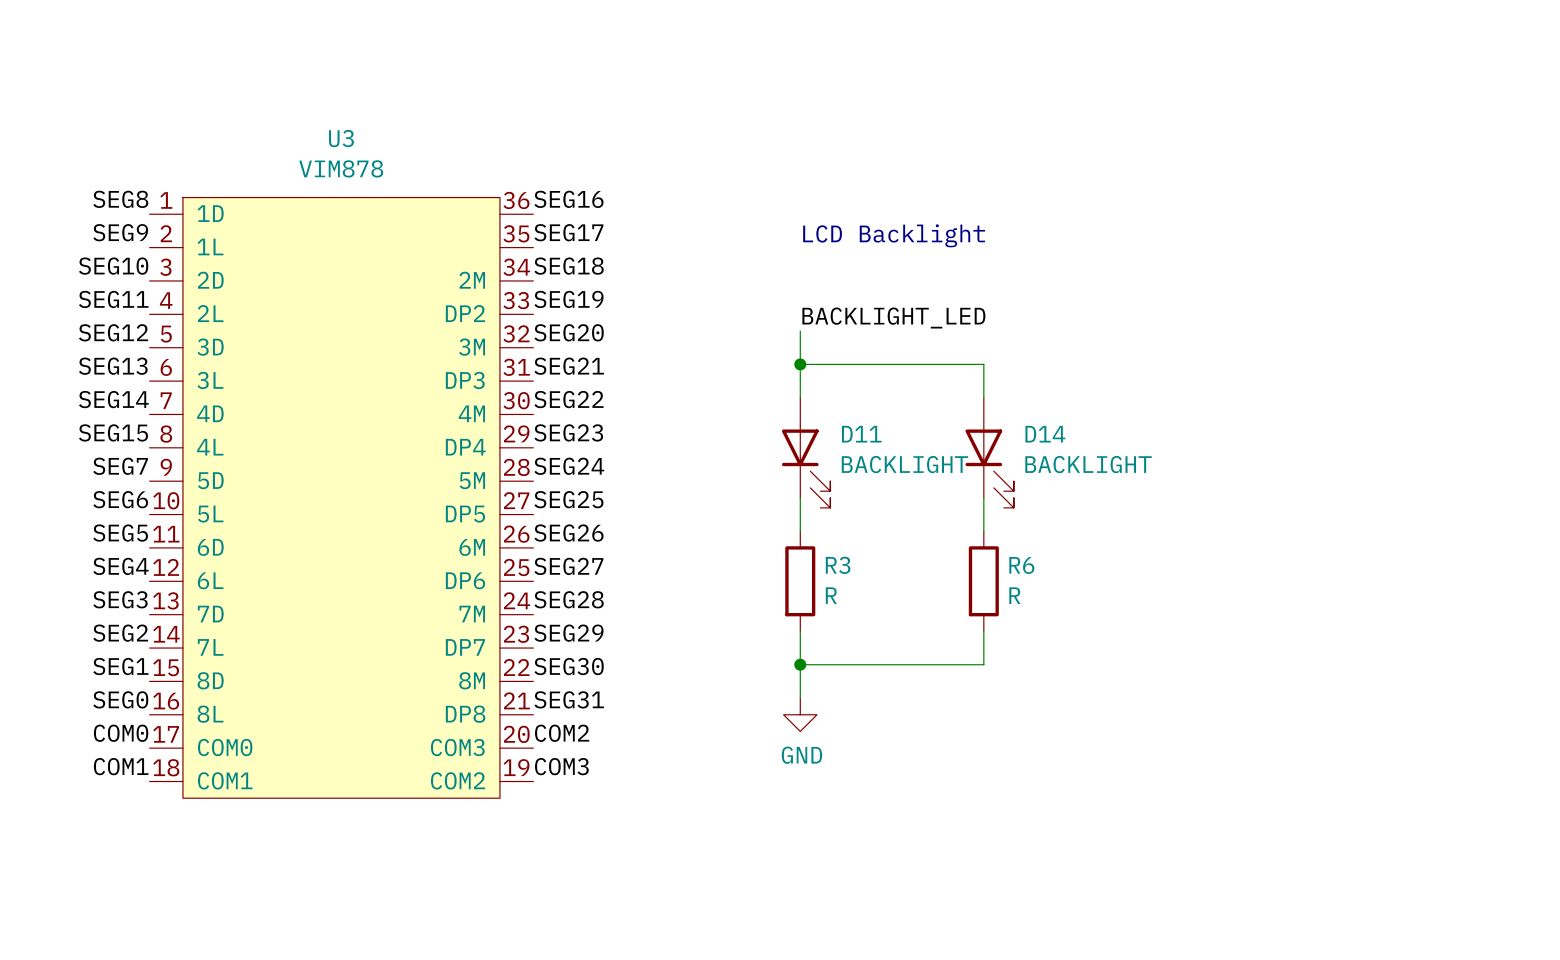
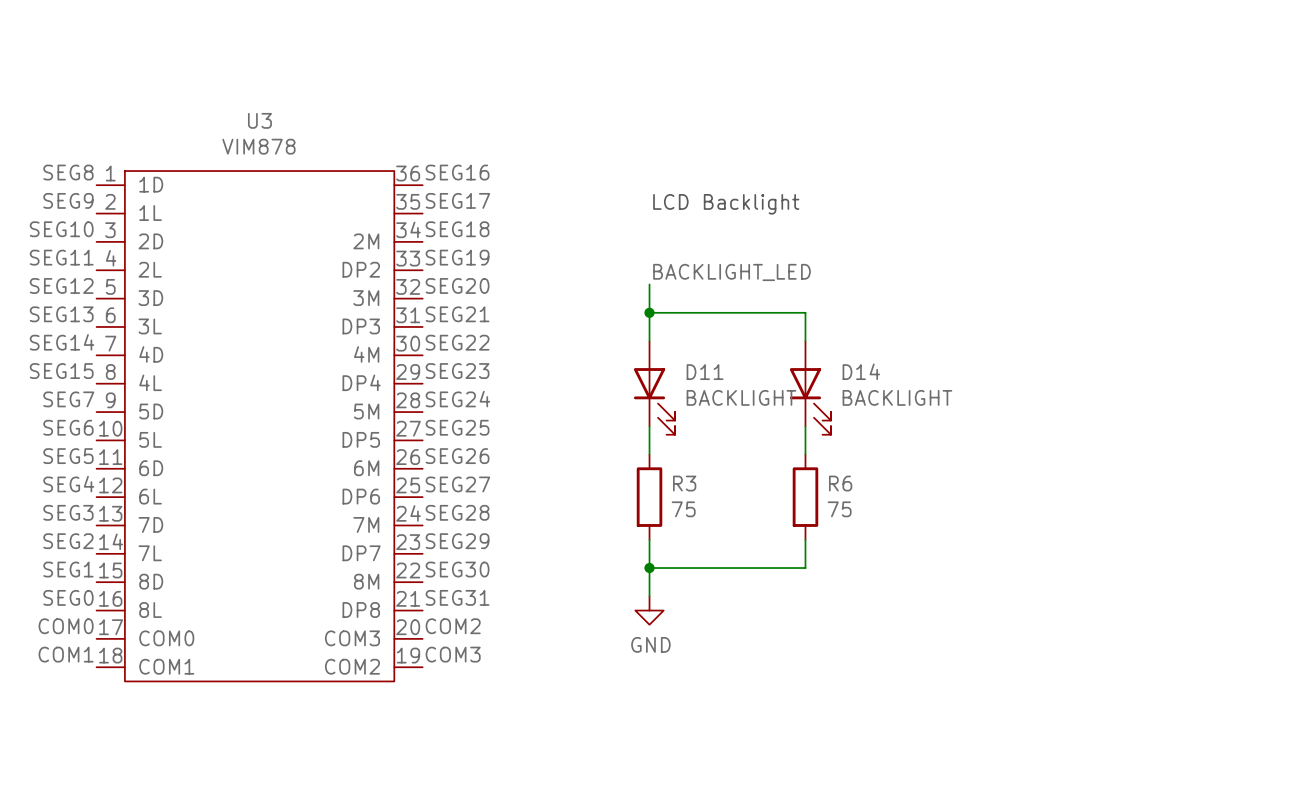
R3 value: R (831, 595) -> 75 (683, 509)
R6 value: R (1014, 595) -> 75 (839, 509)

